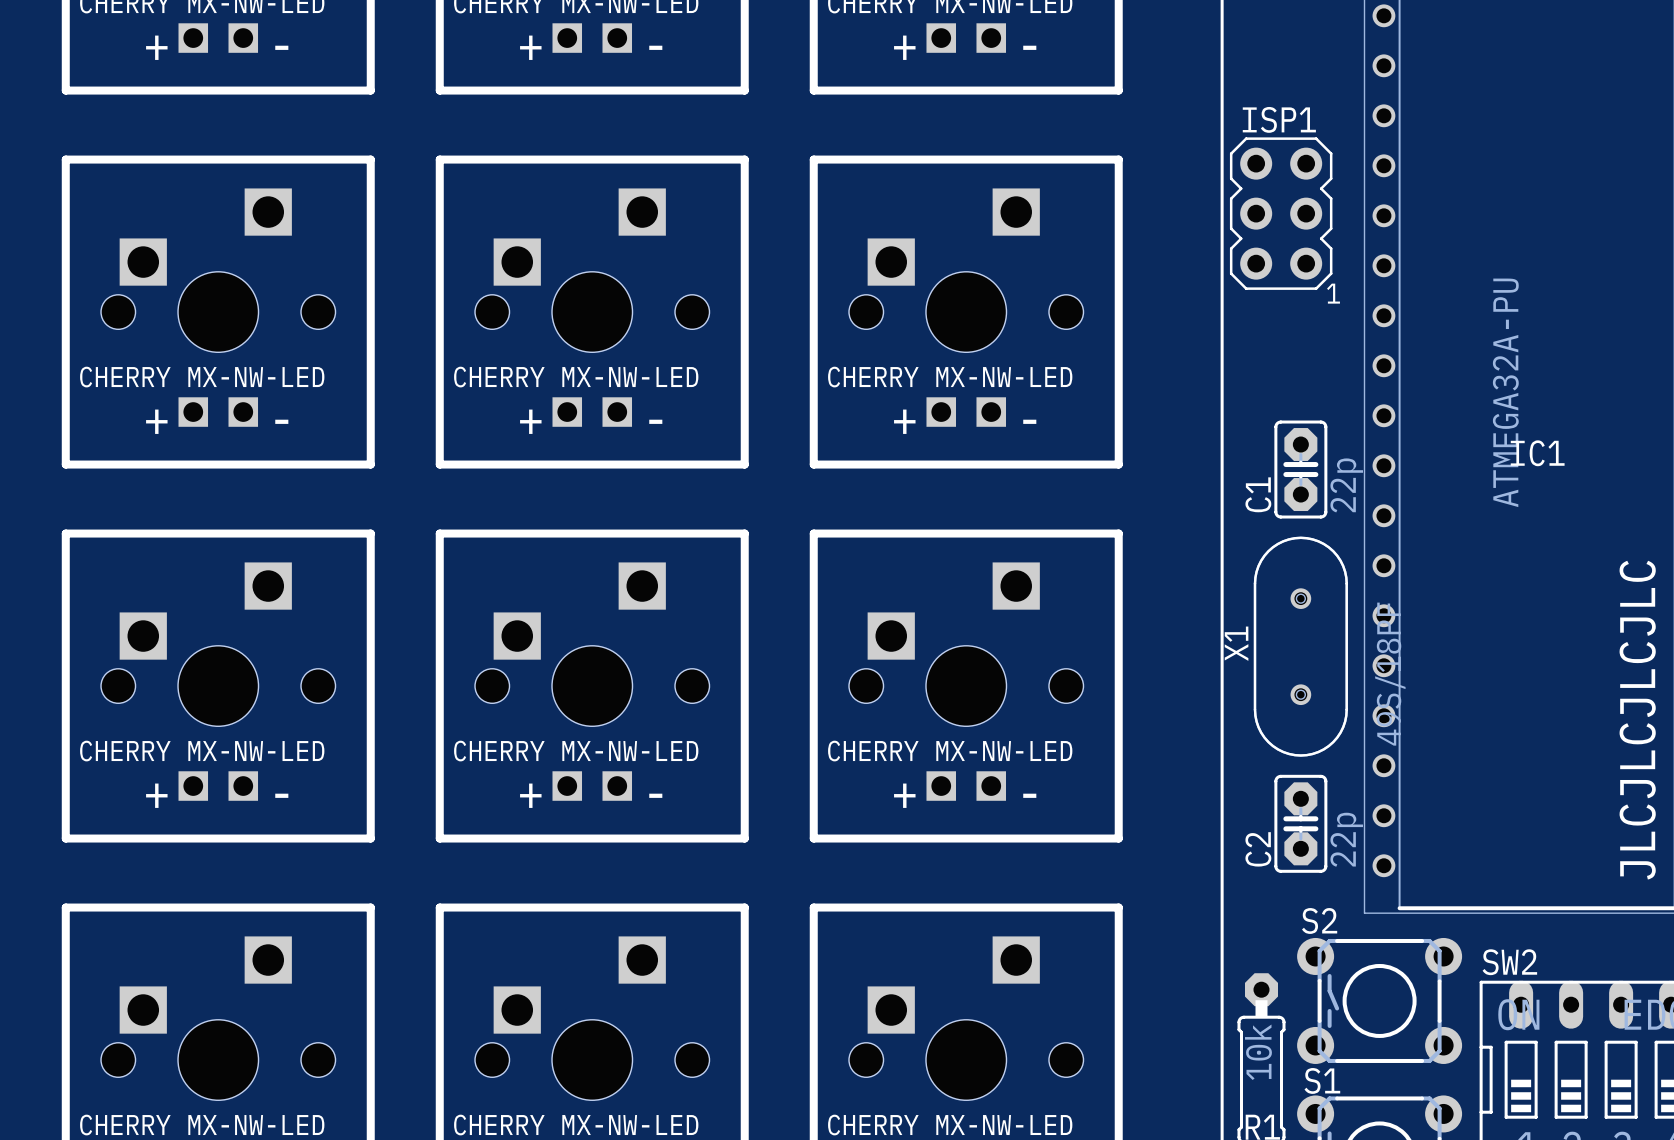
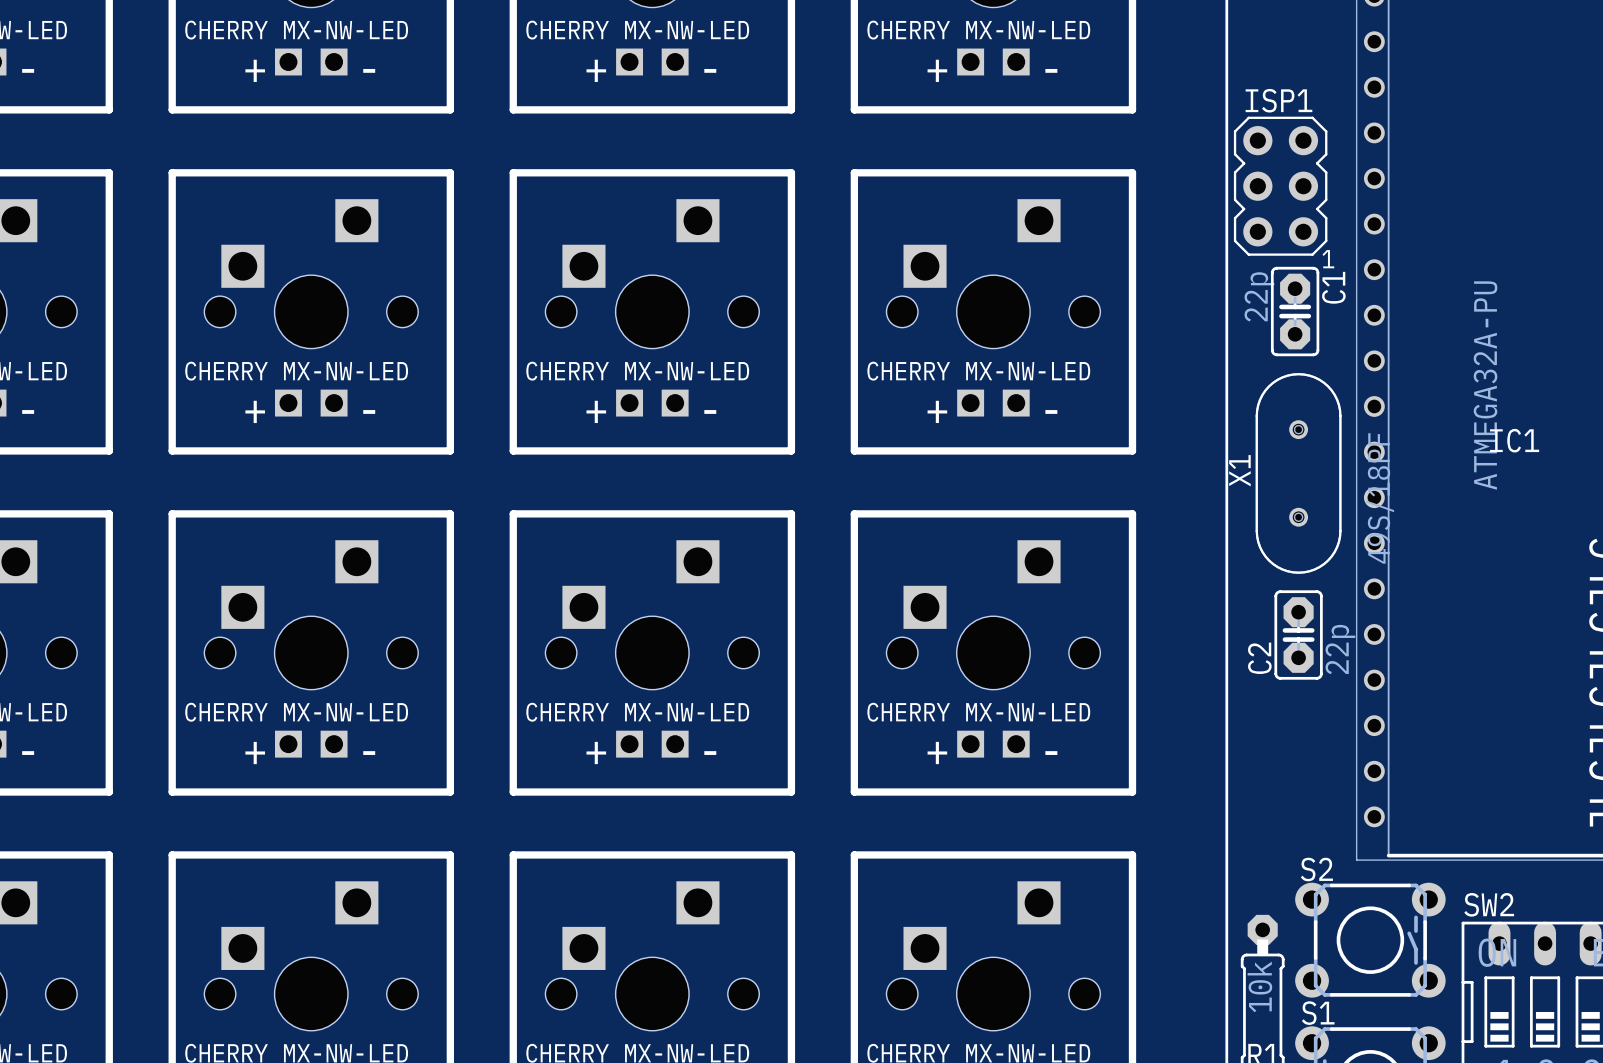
ISP1 position: (1281, 213) -> (1280, 186)
C1 position: (1300, 469) -> (1295, 311)
C1 value position: 22p (1346, 485) -> 22p (1259, 296)
C1 name position: C1 (1258, 494) -> C1 (1333, 287)
X1 position: (1300, 646) -> (1298, 473)
C2 position: (1300, 823) -> (1298, 635)
S2 rotation: 0° (1379, 1000) -> 180° (1370, 940)

